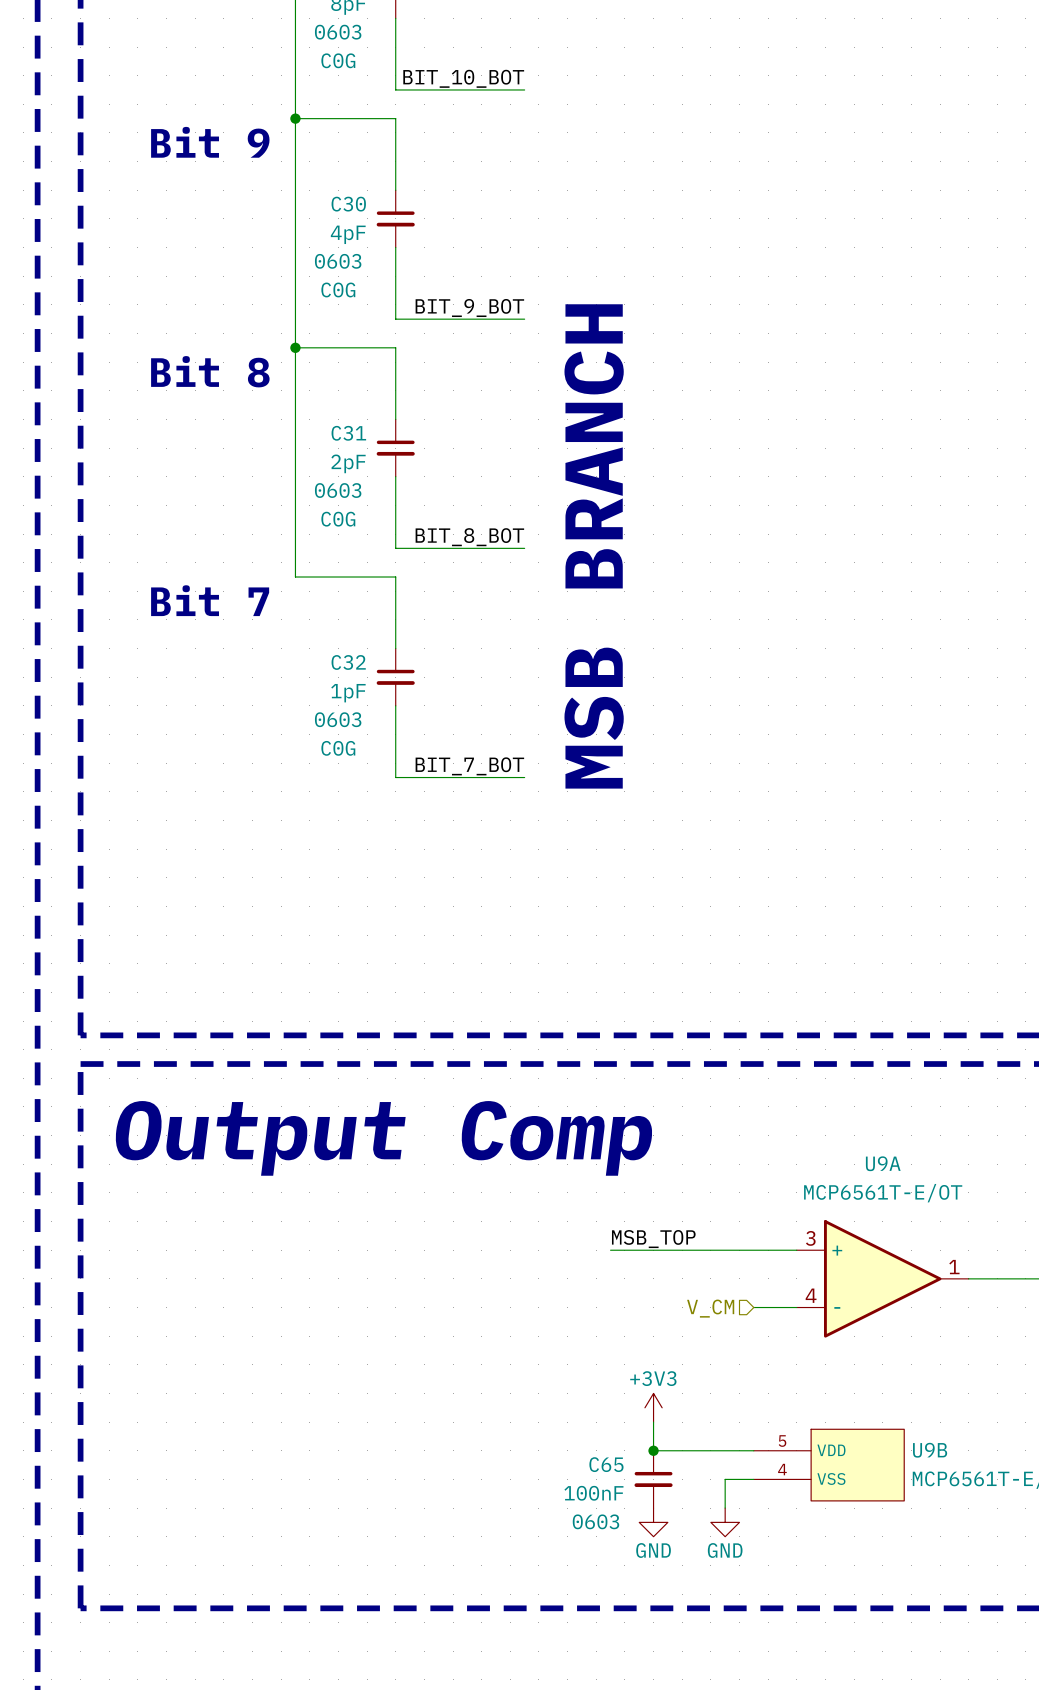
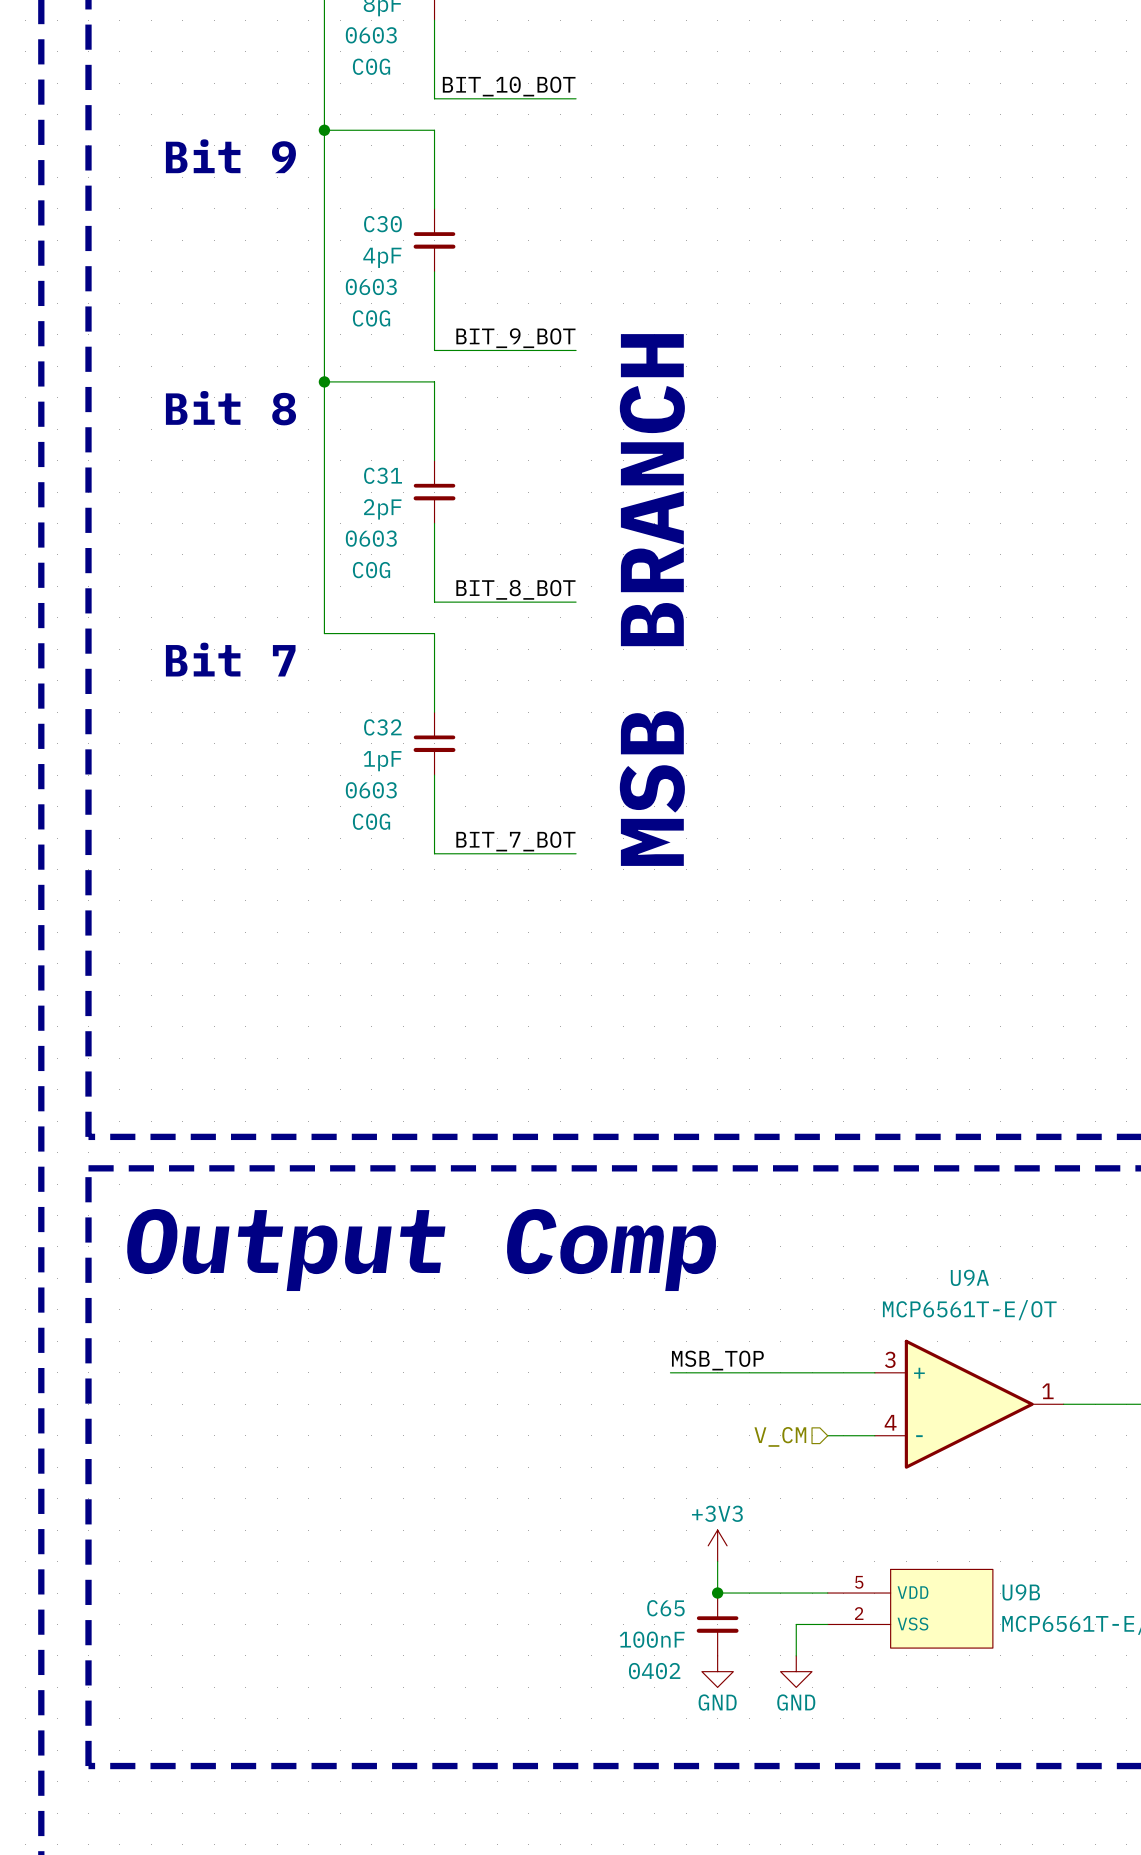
U9B pin number: 4 (782, 1469) -> 2 (859, 1613)
C65 text: 0603 (595, 1521) -> 0402 (654, 1671)

